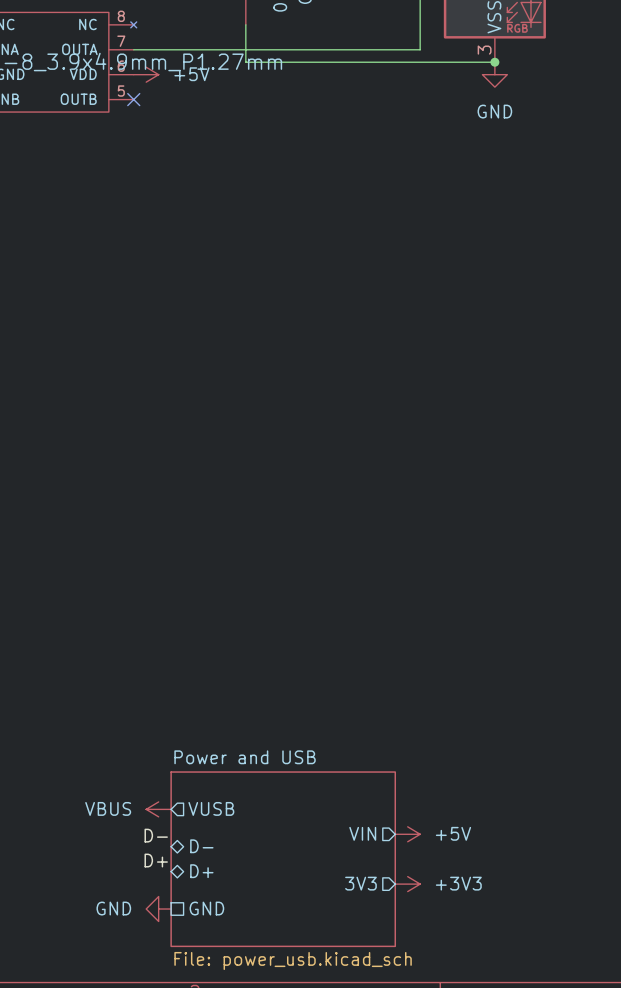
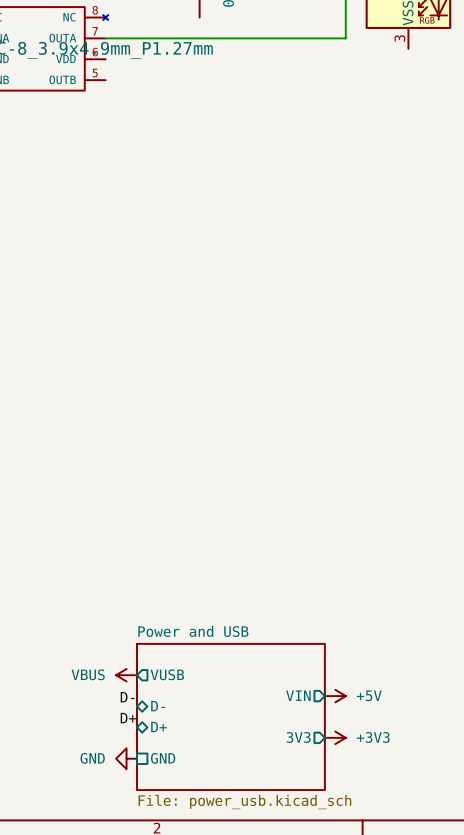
wire: (245, 24) (245, 62) (494, 62) -> none
junction: (494, 62) -> none
power symbol: +5V (146, 74) -> none
power symbol: GND (494, 74) -> none
no-connect mark: (133, 99) -> none

